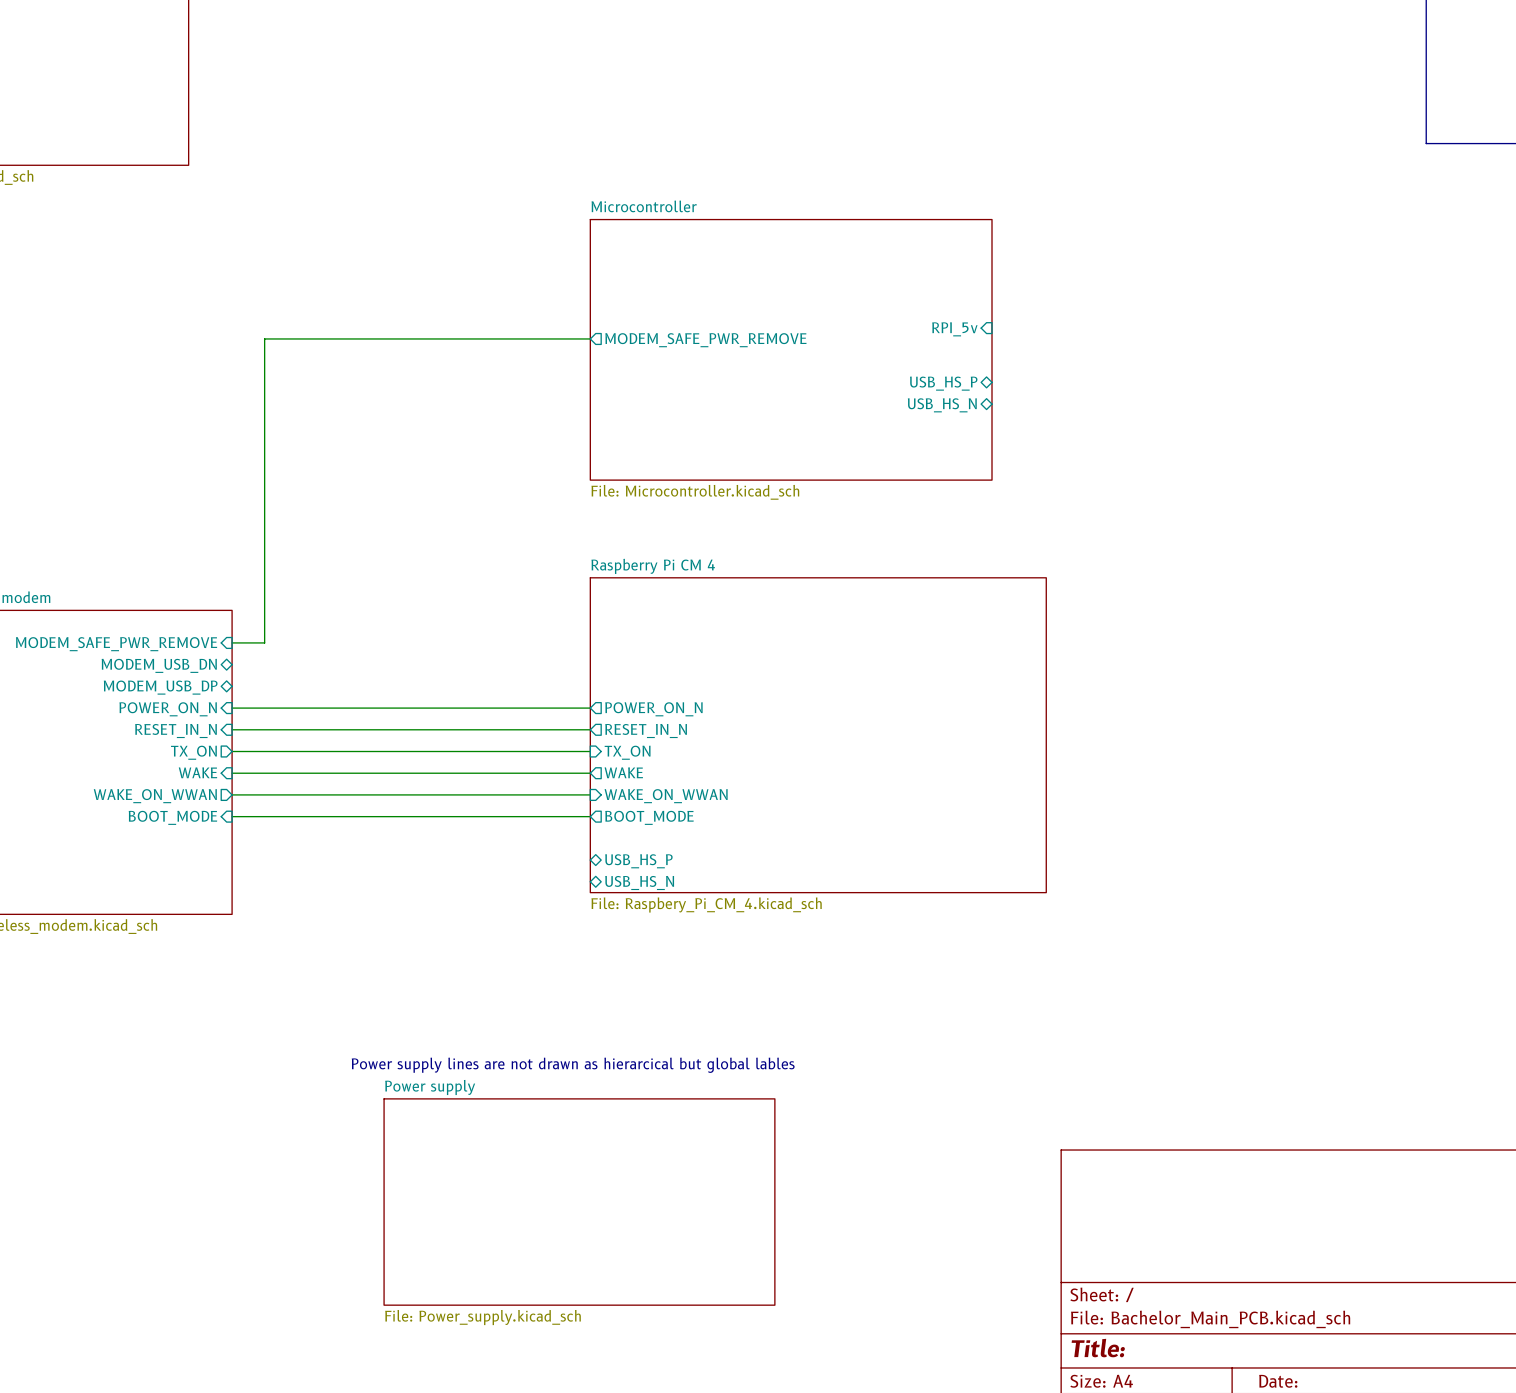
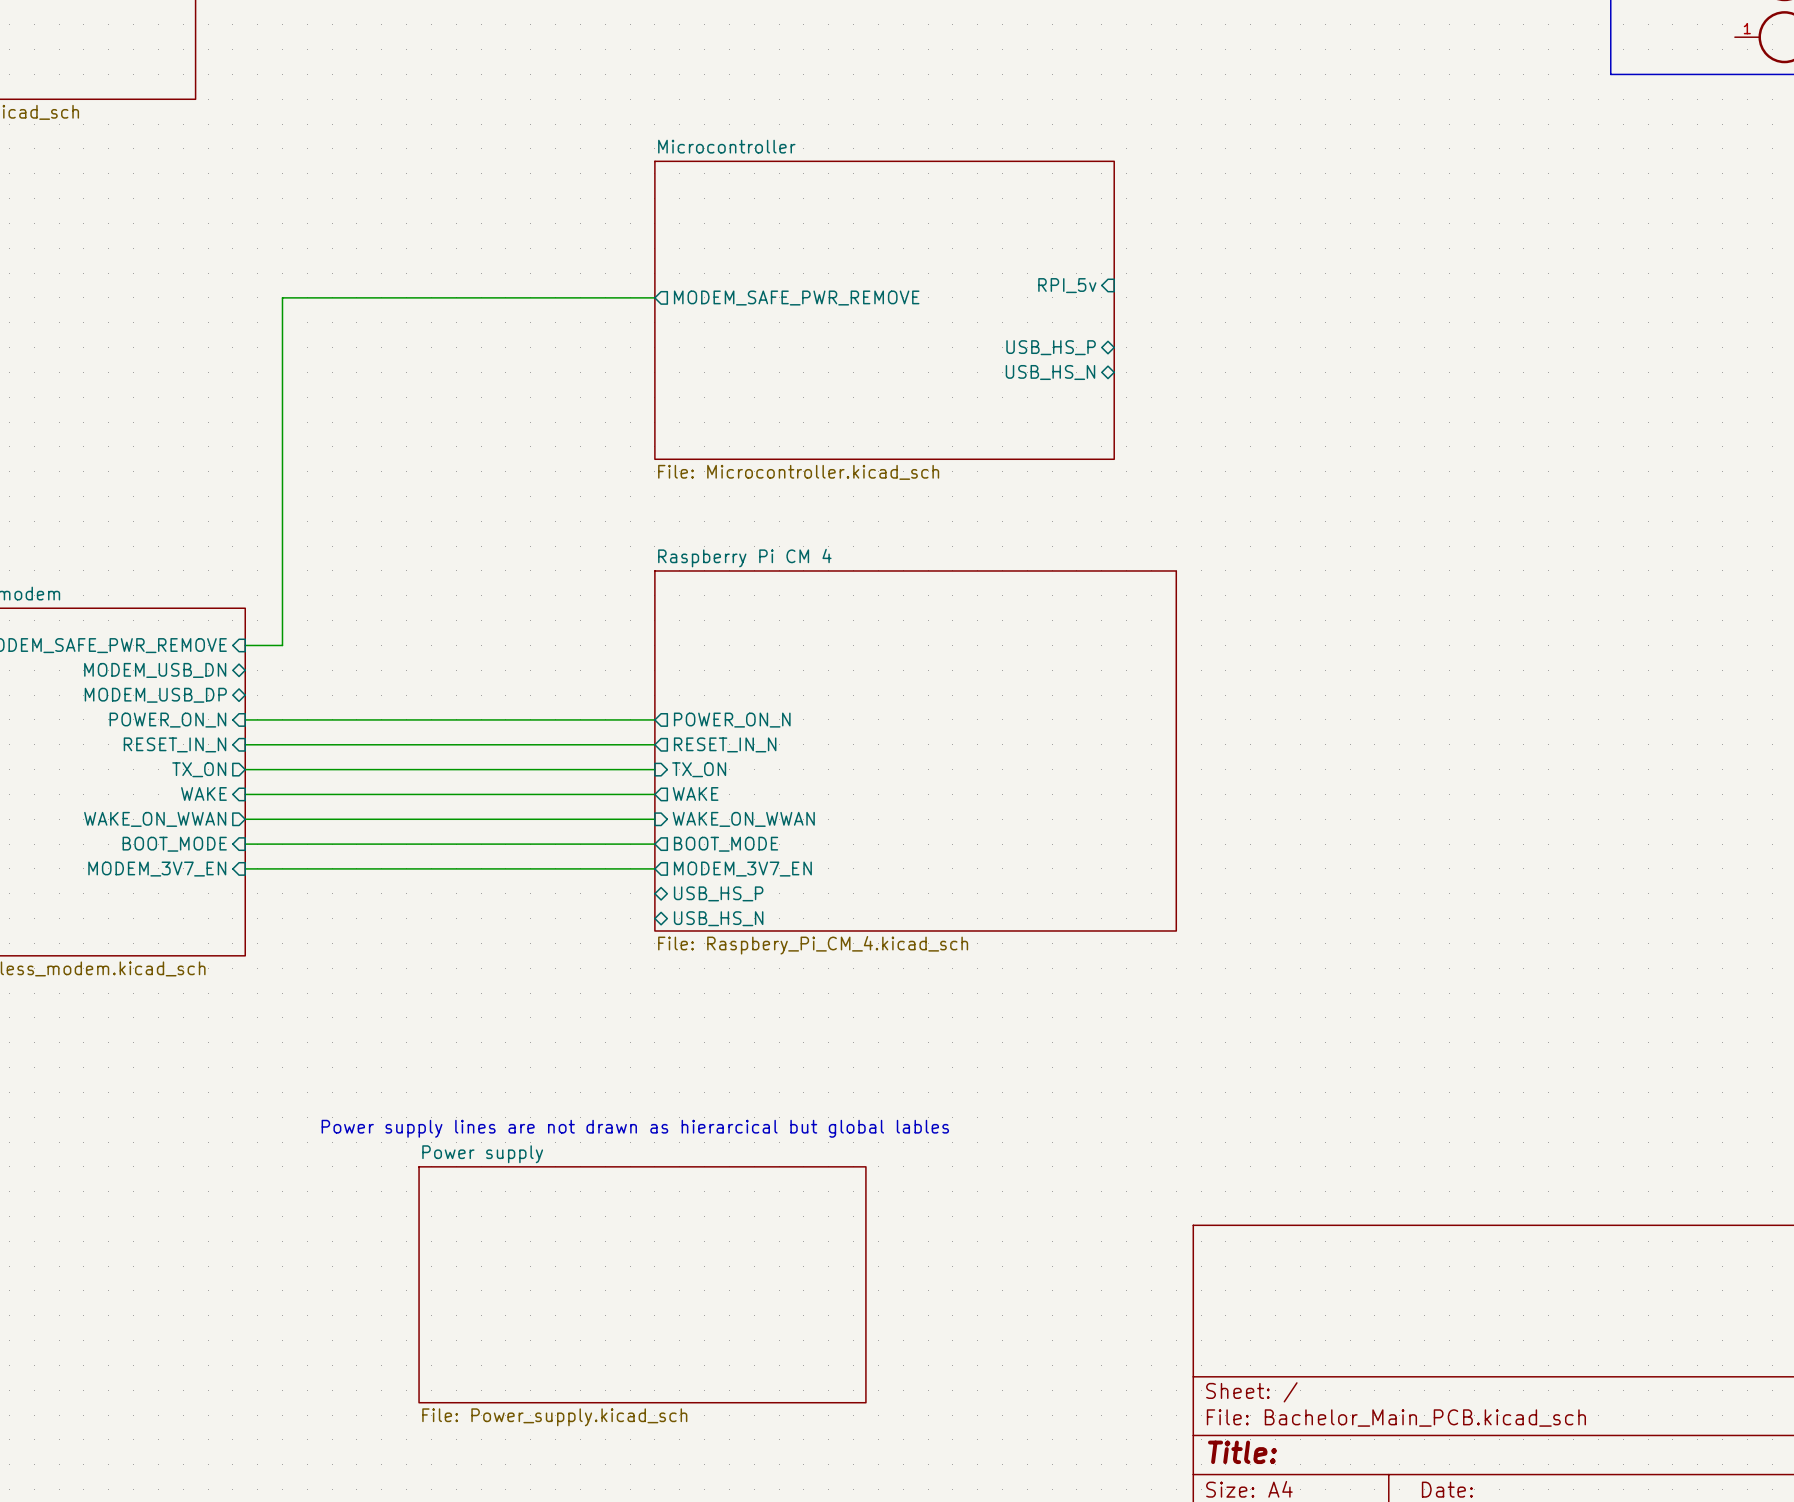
wire: none -> (245, 868) (654, 868)
sheet pin: none -> MODEM_3V7_EN (157, 869)
sheet pin: none -> MODEM_3V7_EN (742, 869)

